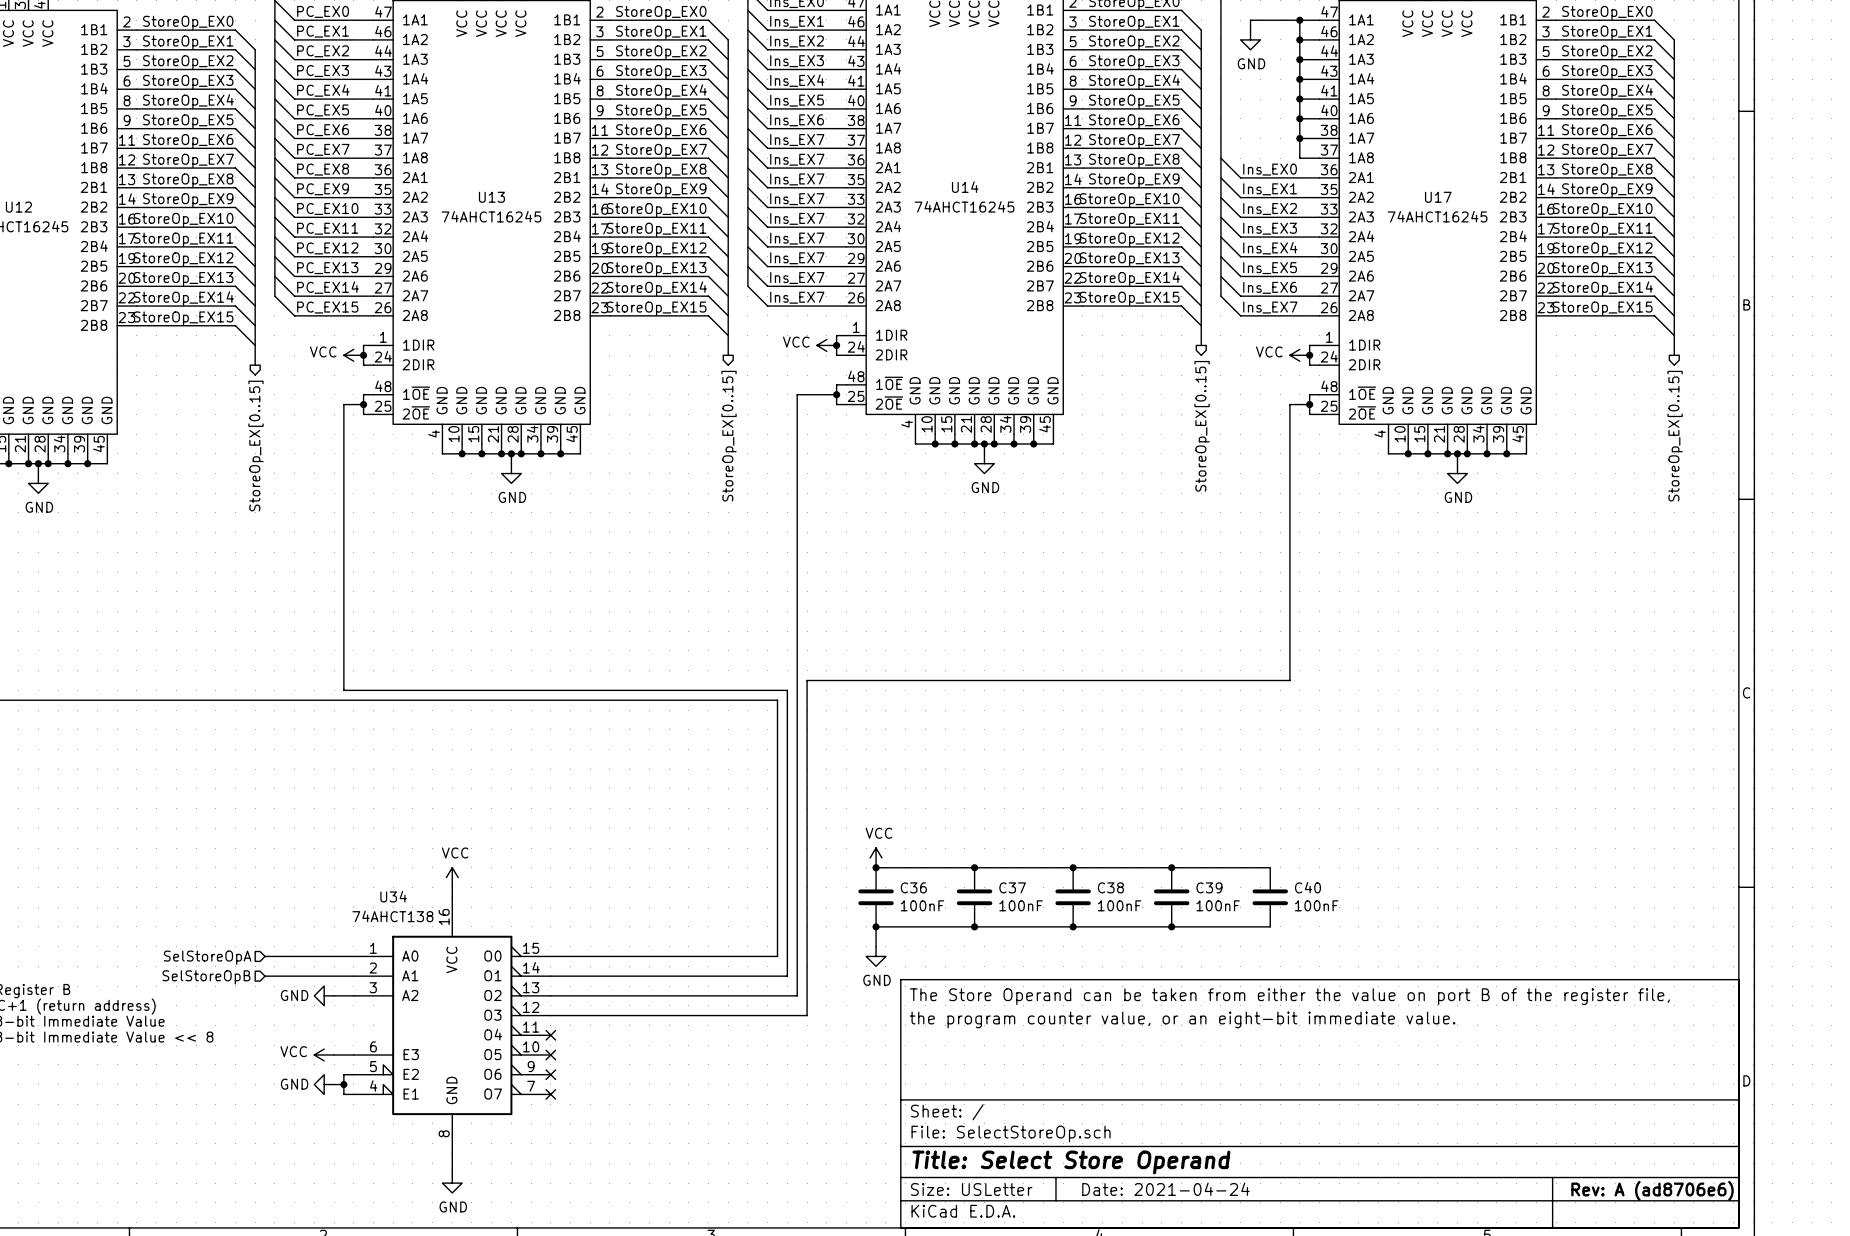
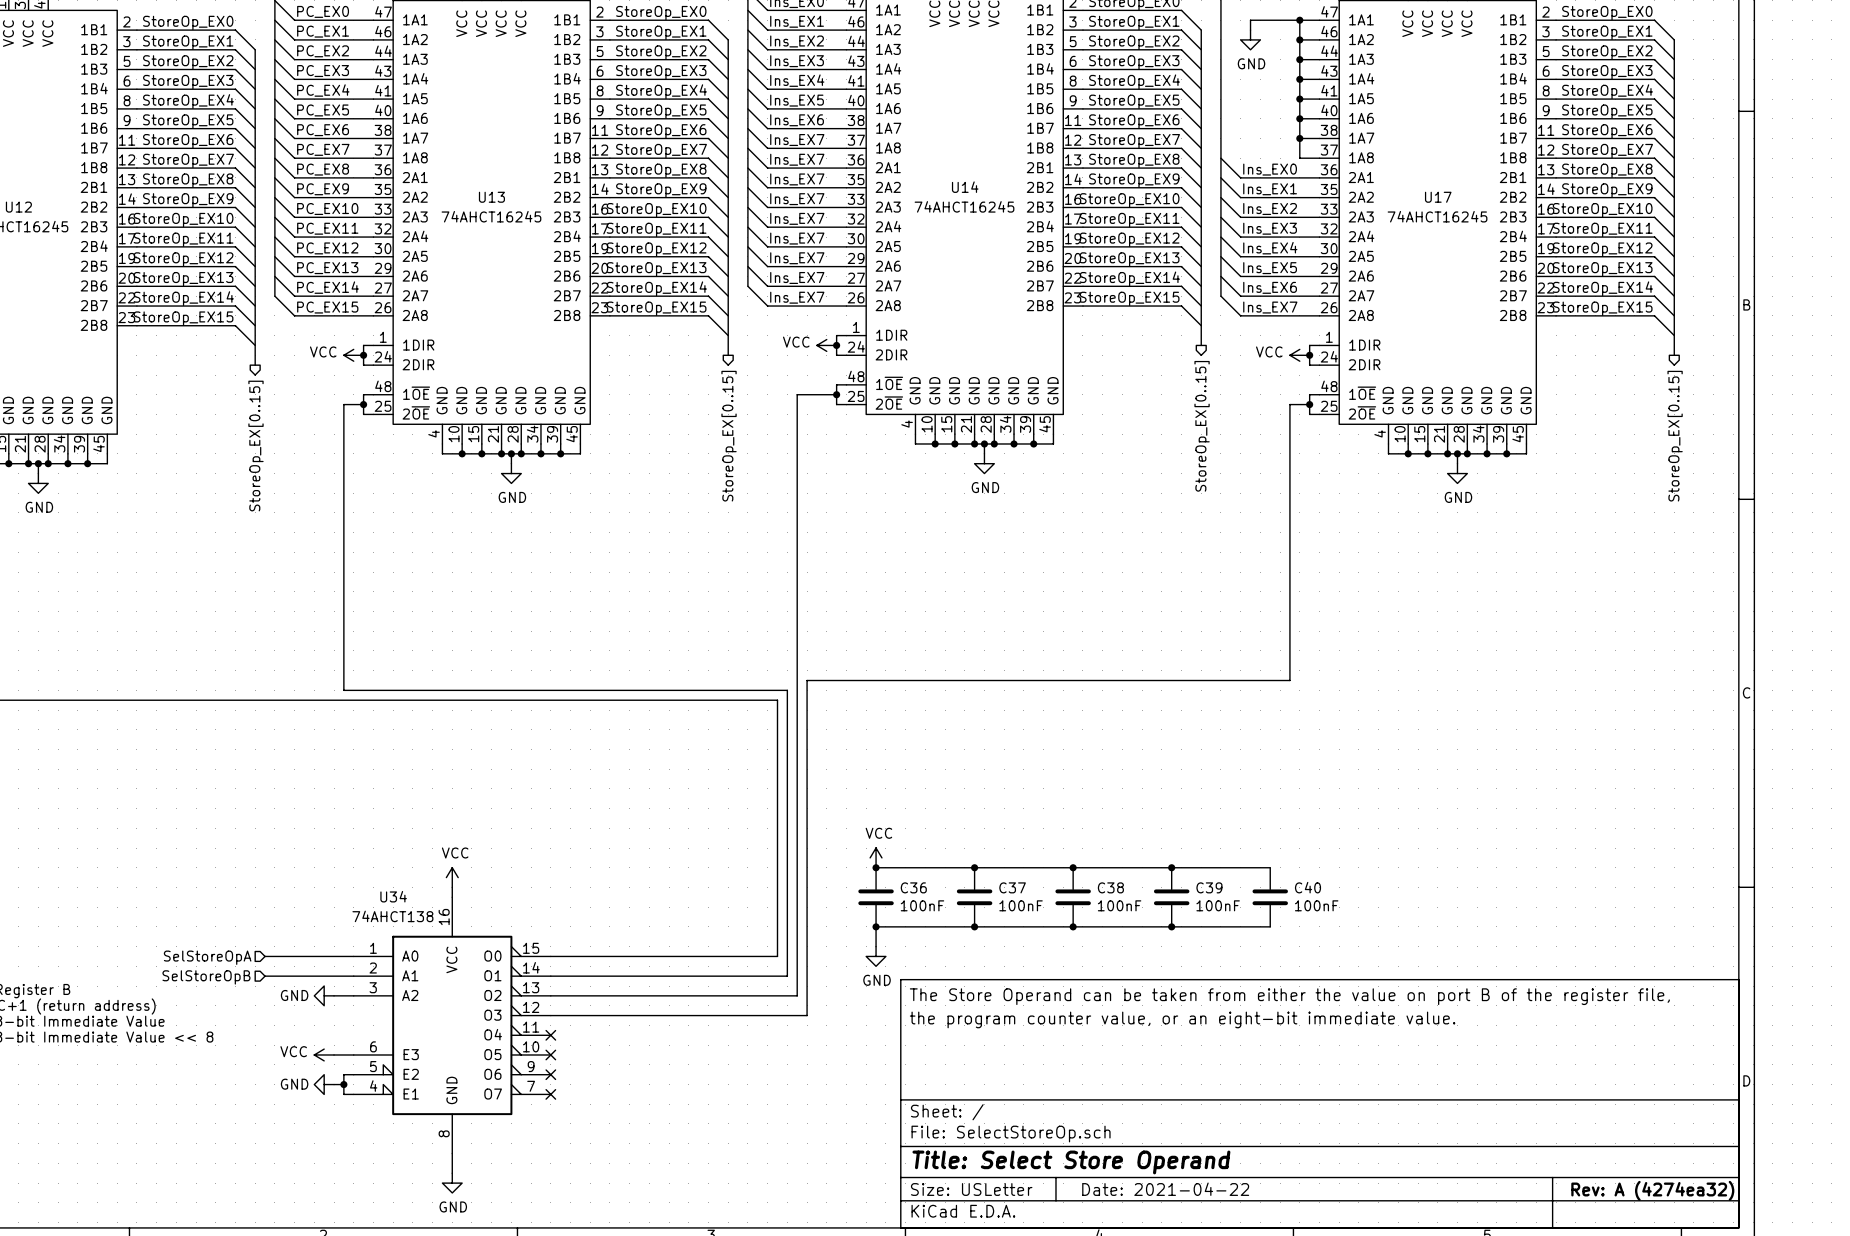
title block: Date: 2021-04-24 (1165, 1189) -> Date: 2021-04-22 (1165, 1189)
title block: Rev: A (ad8706e6) (1652, 1190) -> Rev: A (4274ea32) (1652, 1190)

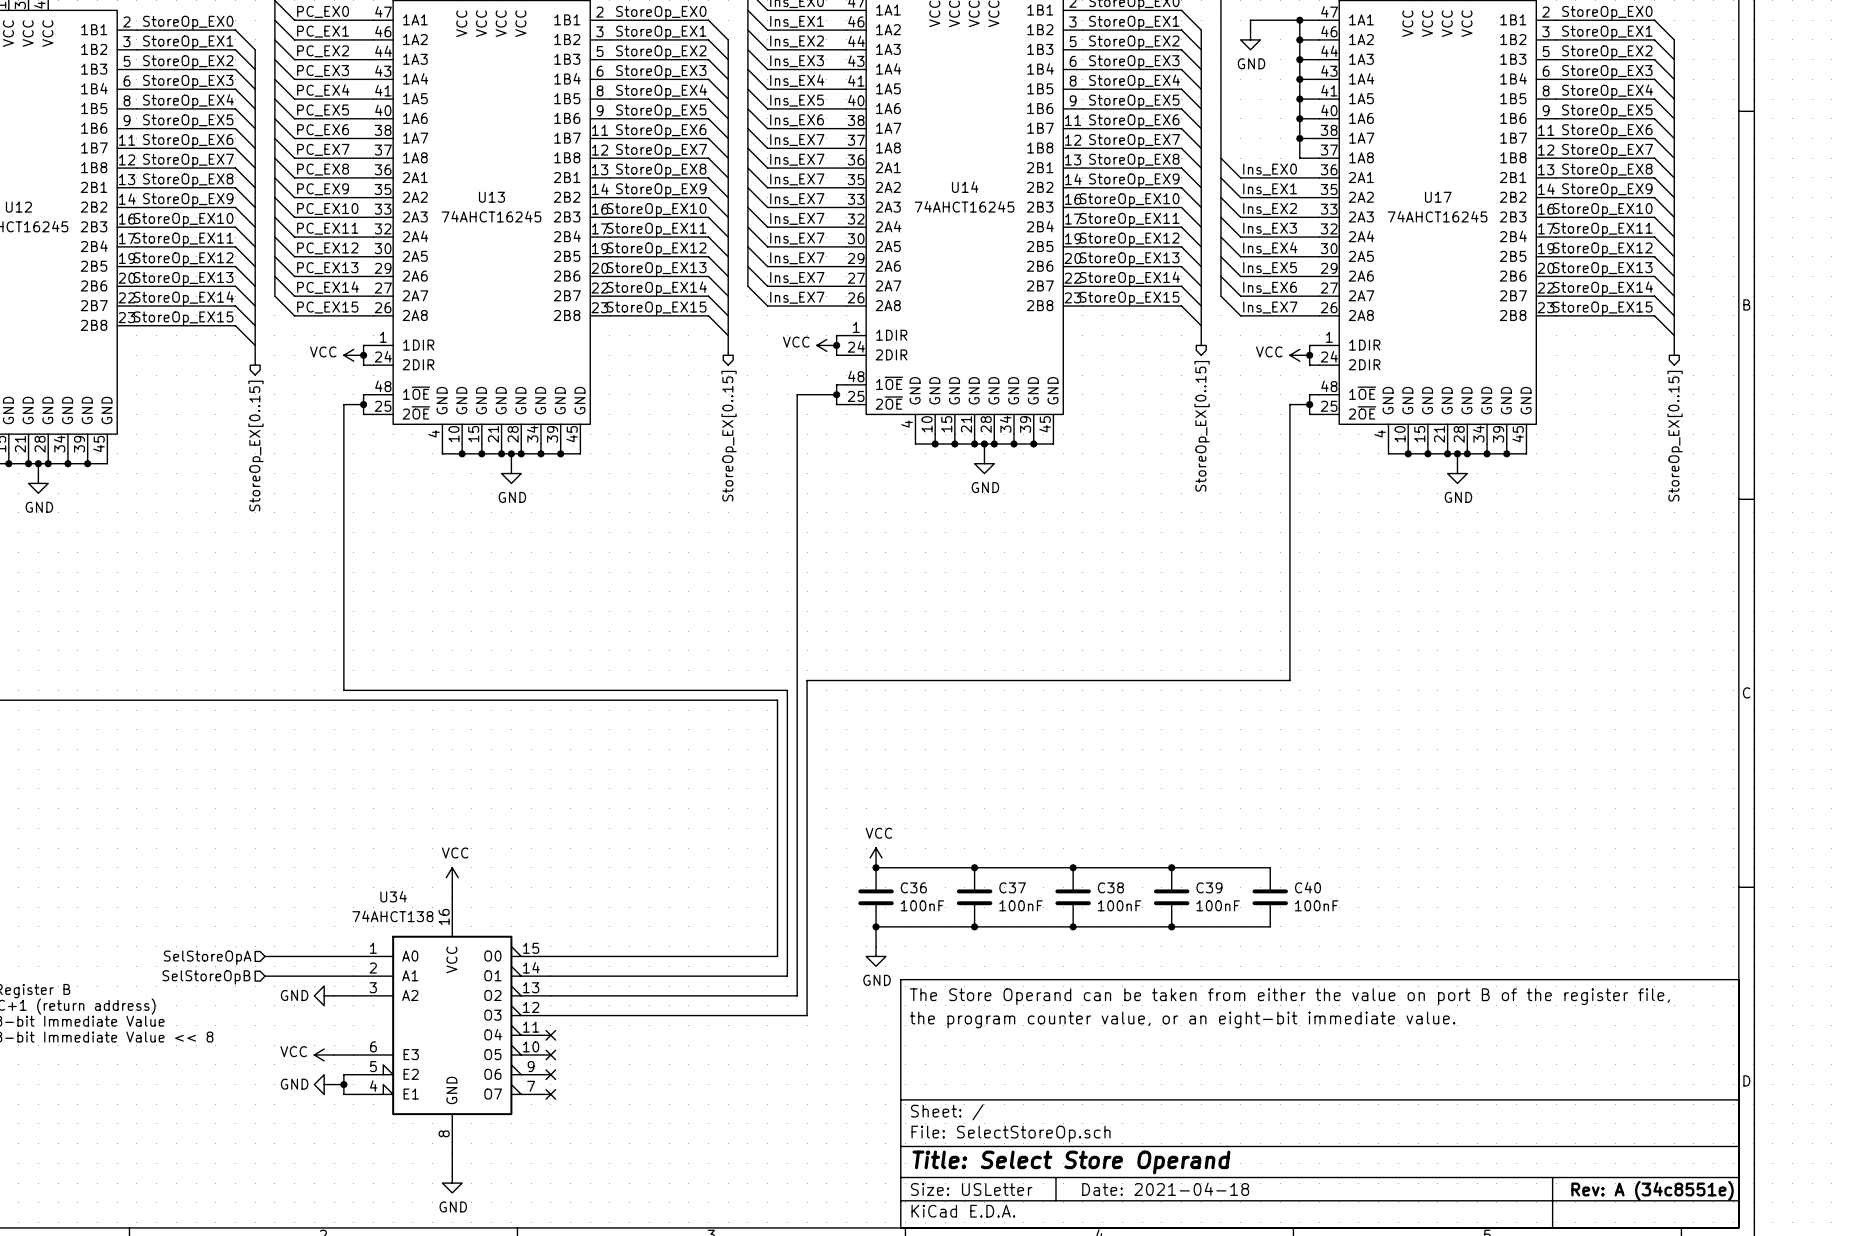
title block: Date: 2021-04-22 (1165, 1189) -> Date: 2021-04-18 (1165, 1189)
title block: Rev: A (4274ea32) (1652, 1190) -> Rev: A (34c8551e) (1652, 1190)

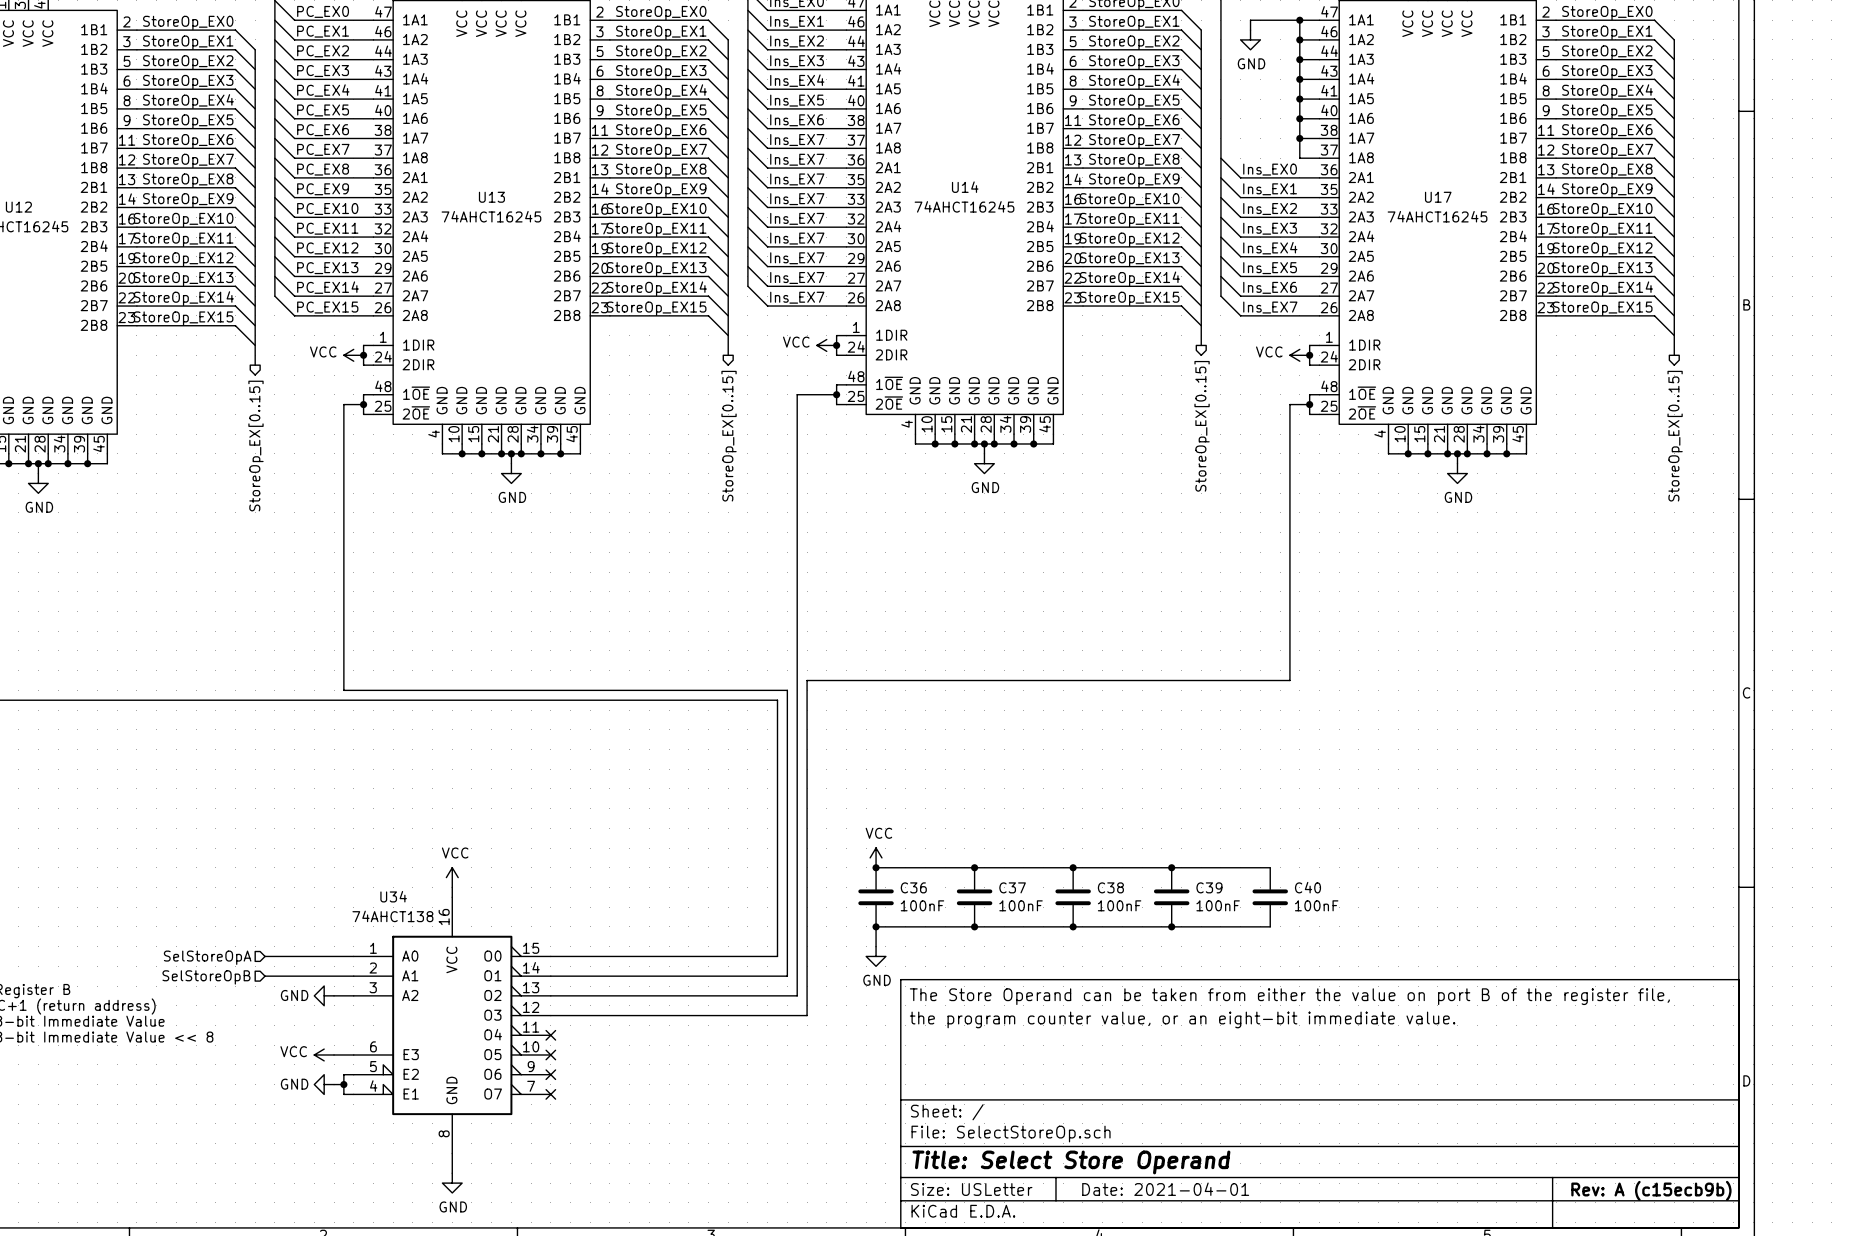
title block: Date: 2021-04-18 (1165, 1189) -> Date: 2021-04-01 (1165, 1189)
title block: Rev: A (34c8551e) (1652, 1190) -> Rev: A (c15ecb9b) (1651, 1190)

